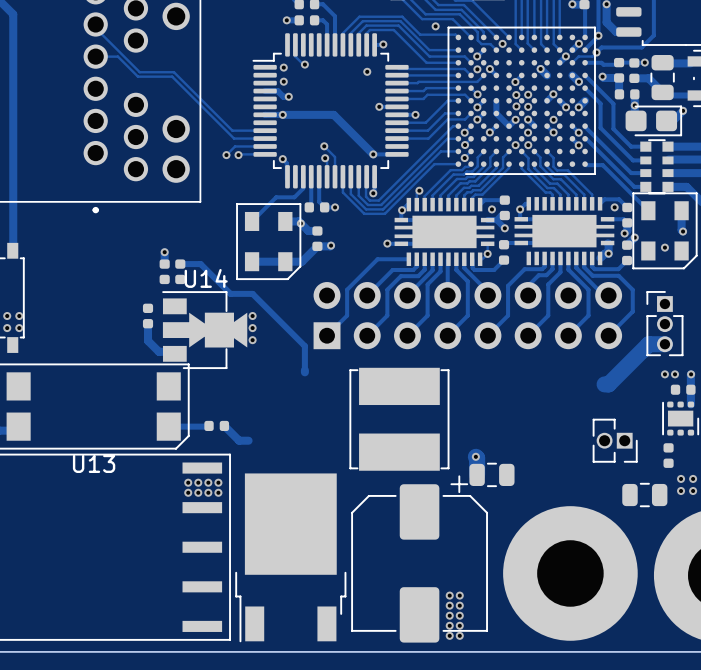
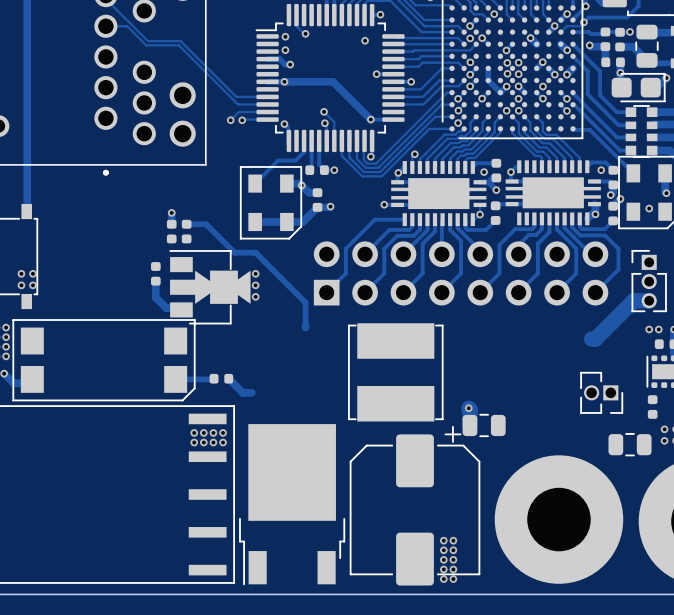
U14 name: U14 (206, 278) -> none
U13 name: U13 (94, 463) -> none

